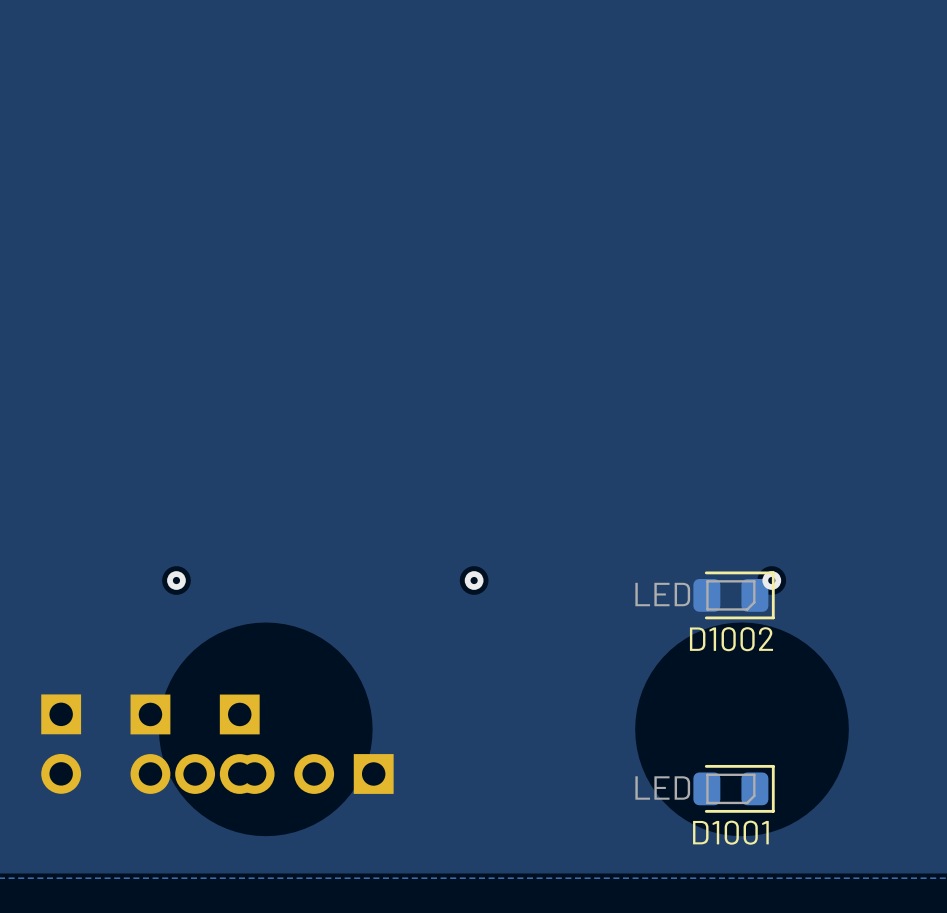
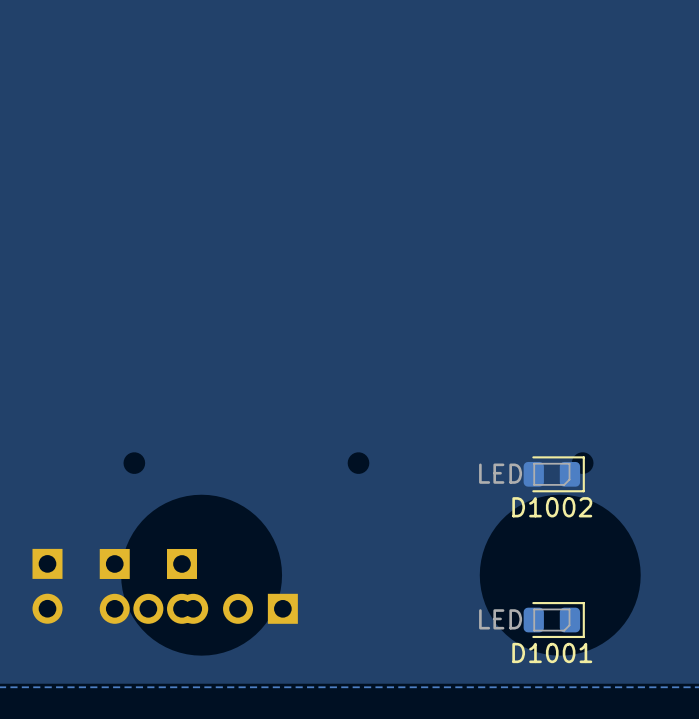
via: (176, 580) -> none
via: (474, 580) -> none
via: (771, 580) -> none

